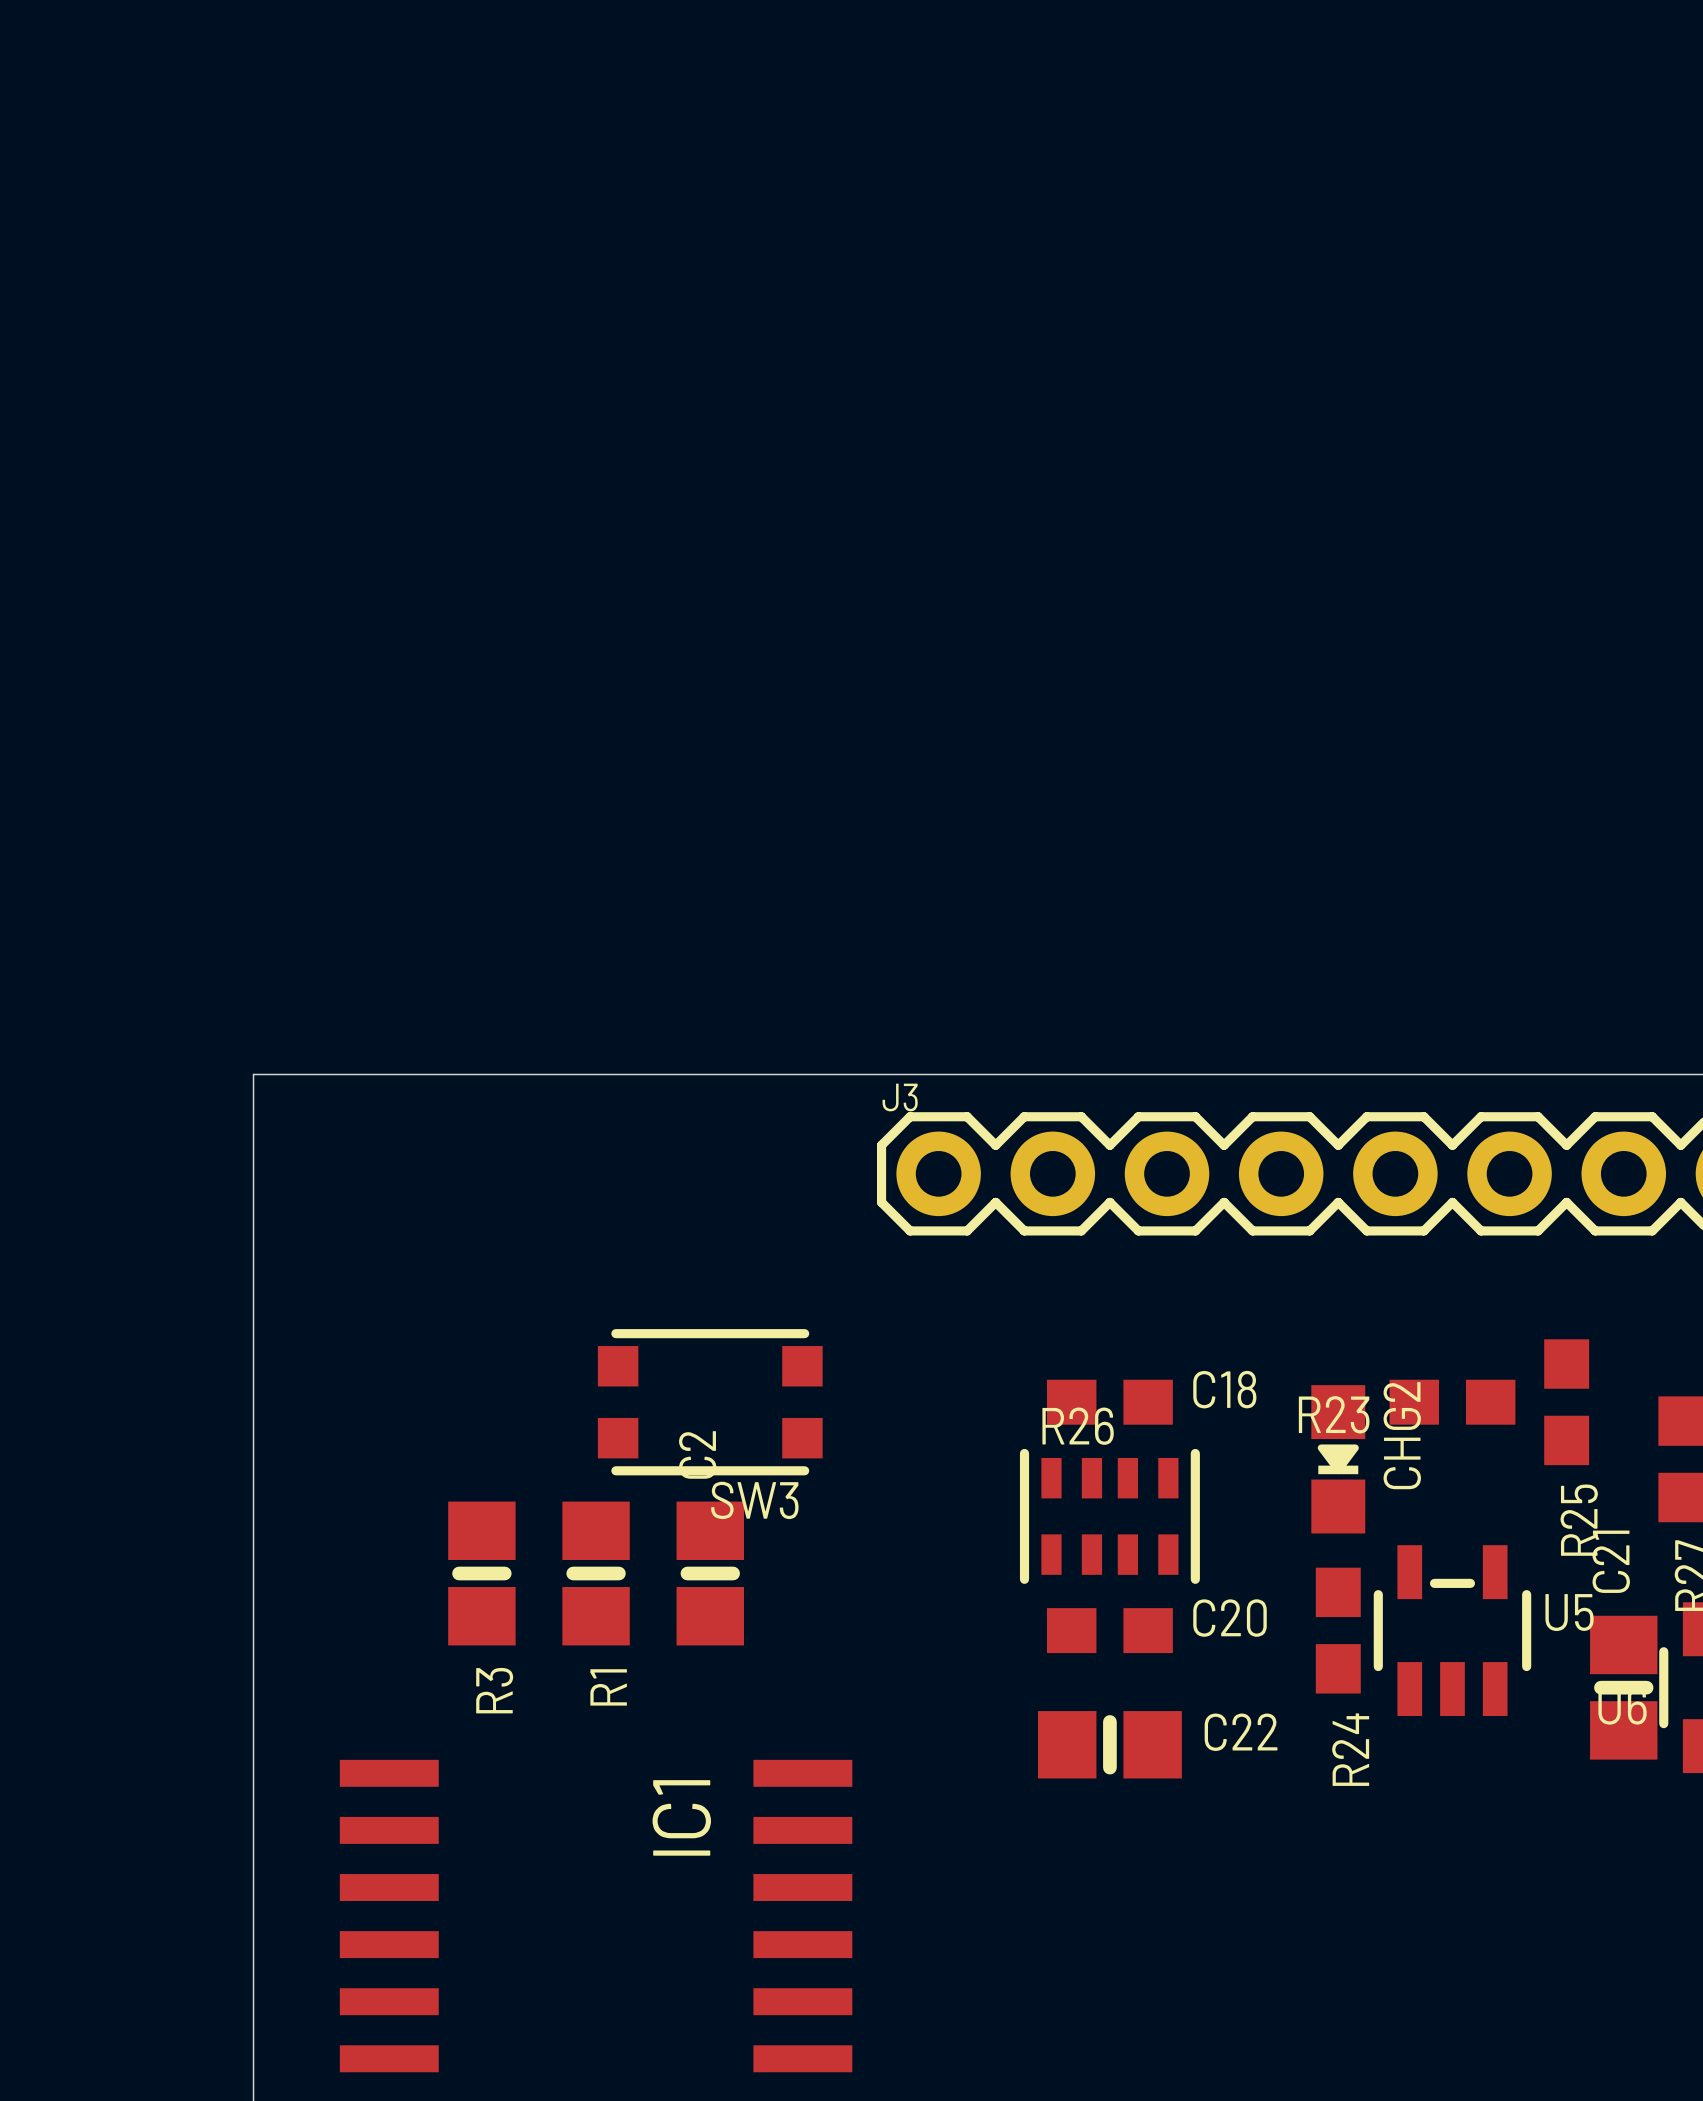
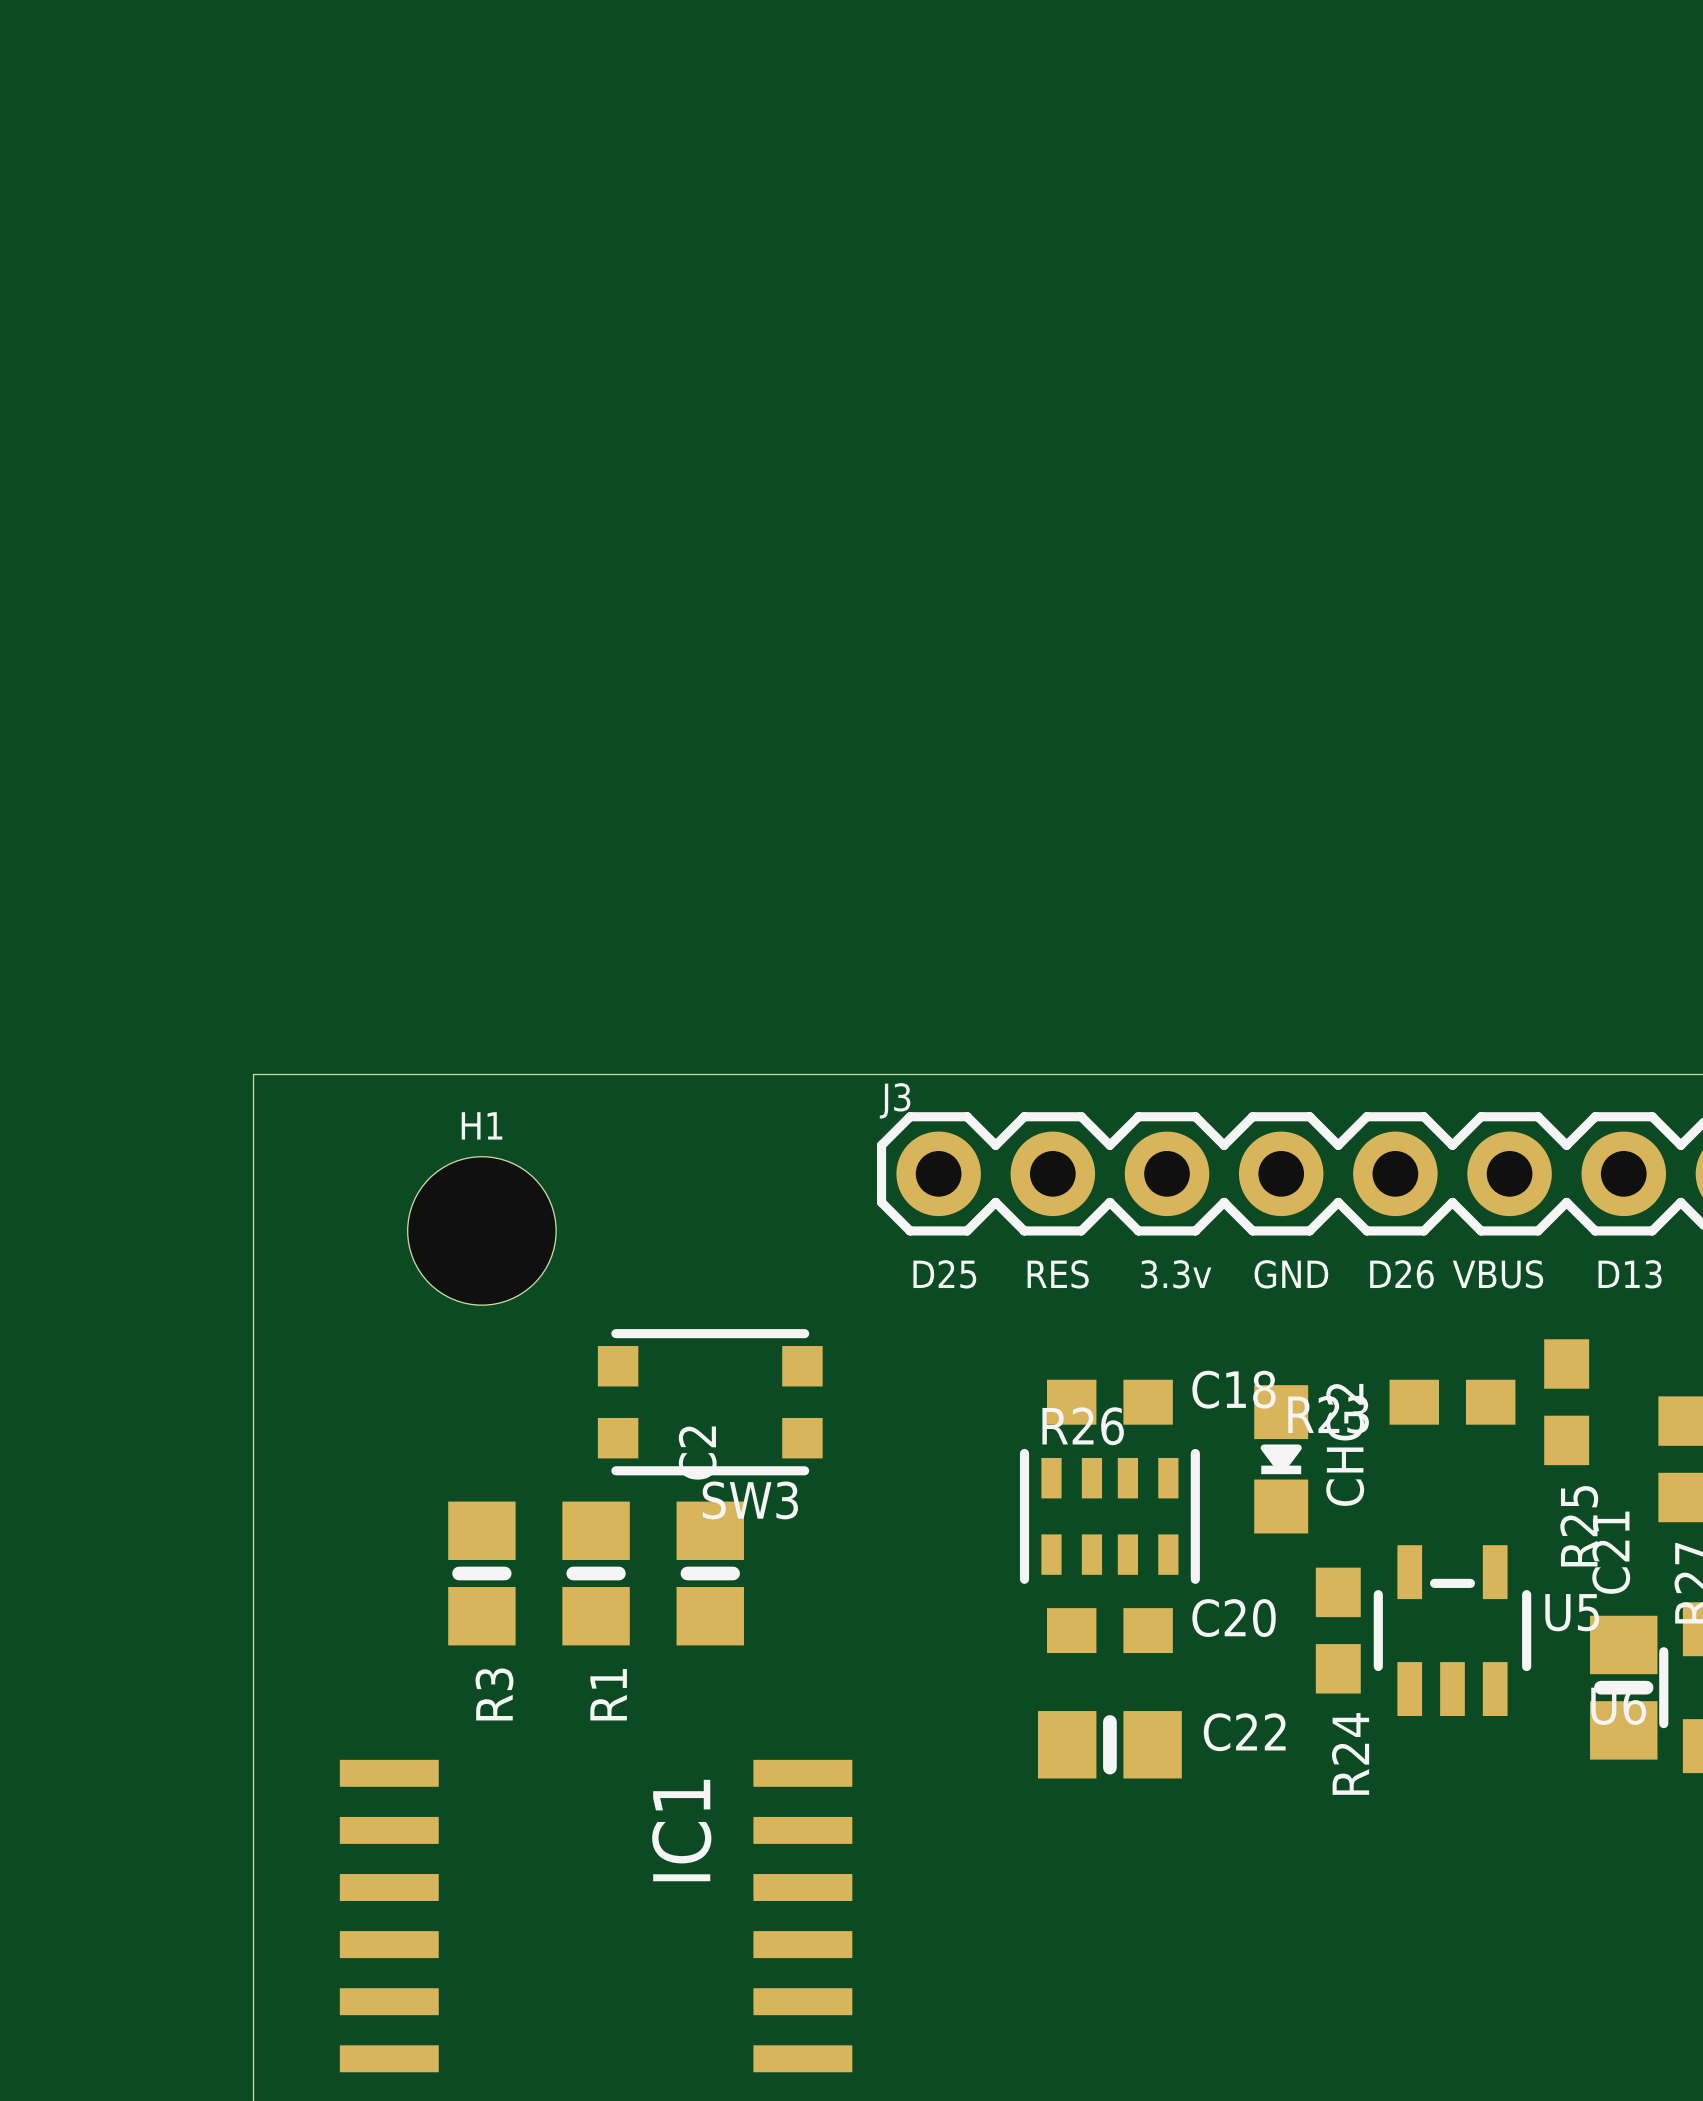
H1: none -> (481, 1230)
text: none -> D25 (944, 1274)
text: none -> RES (1058, 1274)
text: none -> 3.3v (1176, 1274)
text: none -> GND (1291, 1274)
text: none -> D26 (1401, 1274)
text: none -> VBUS (1497, 1274)
text: none -> D13 (1630, 1274)
CHG2 position: (1338, 1459) -> (1281, 1459)

